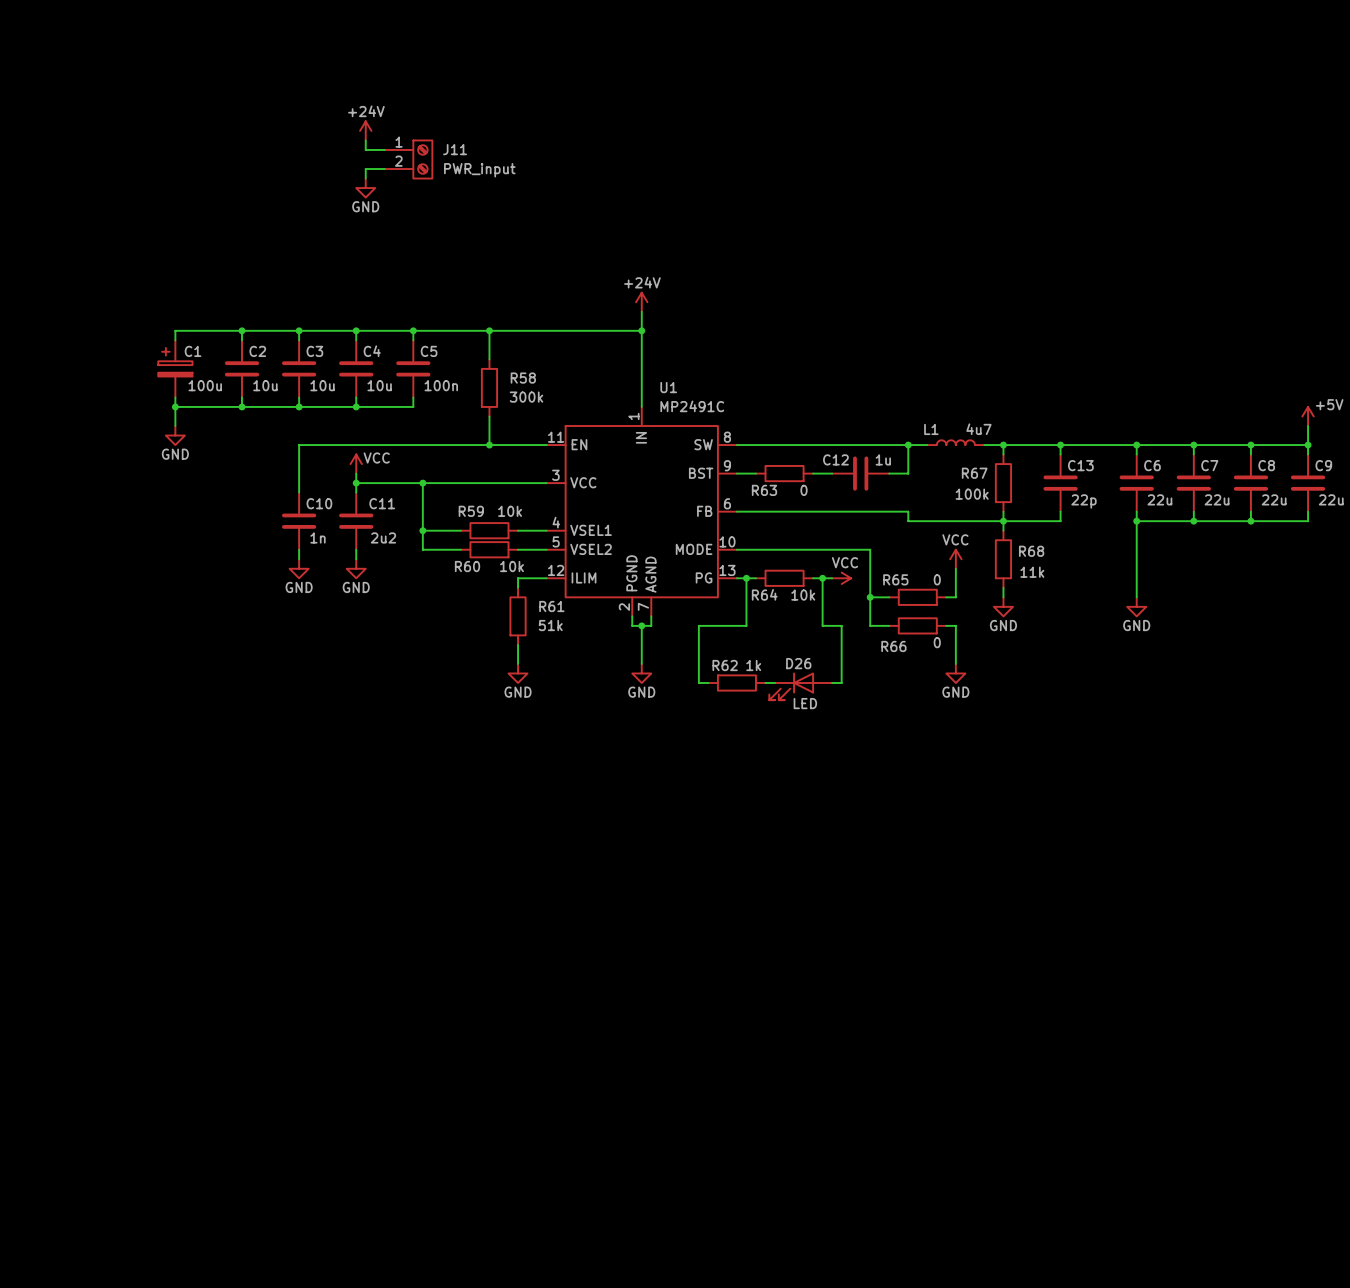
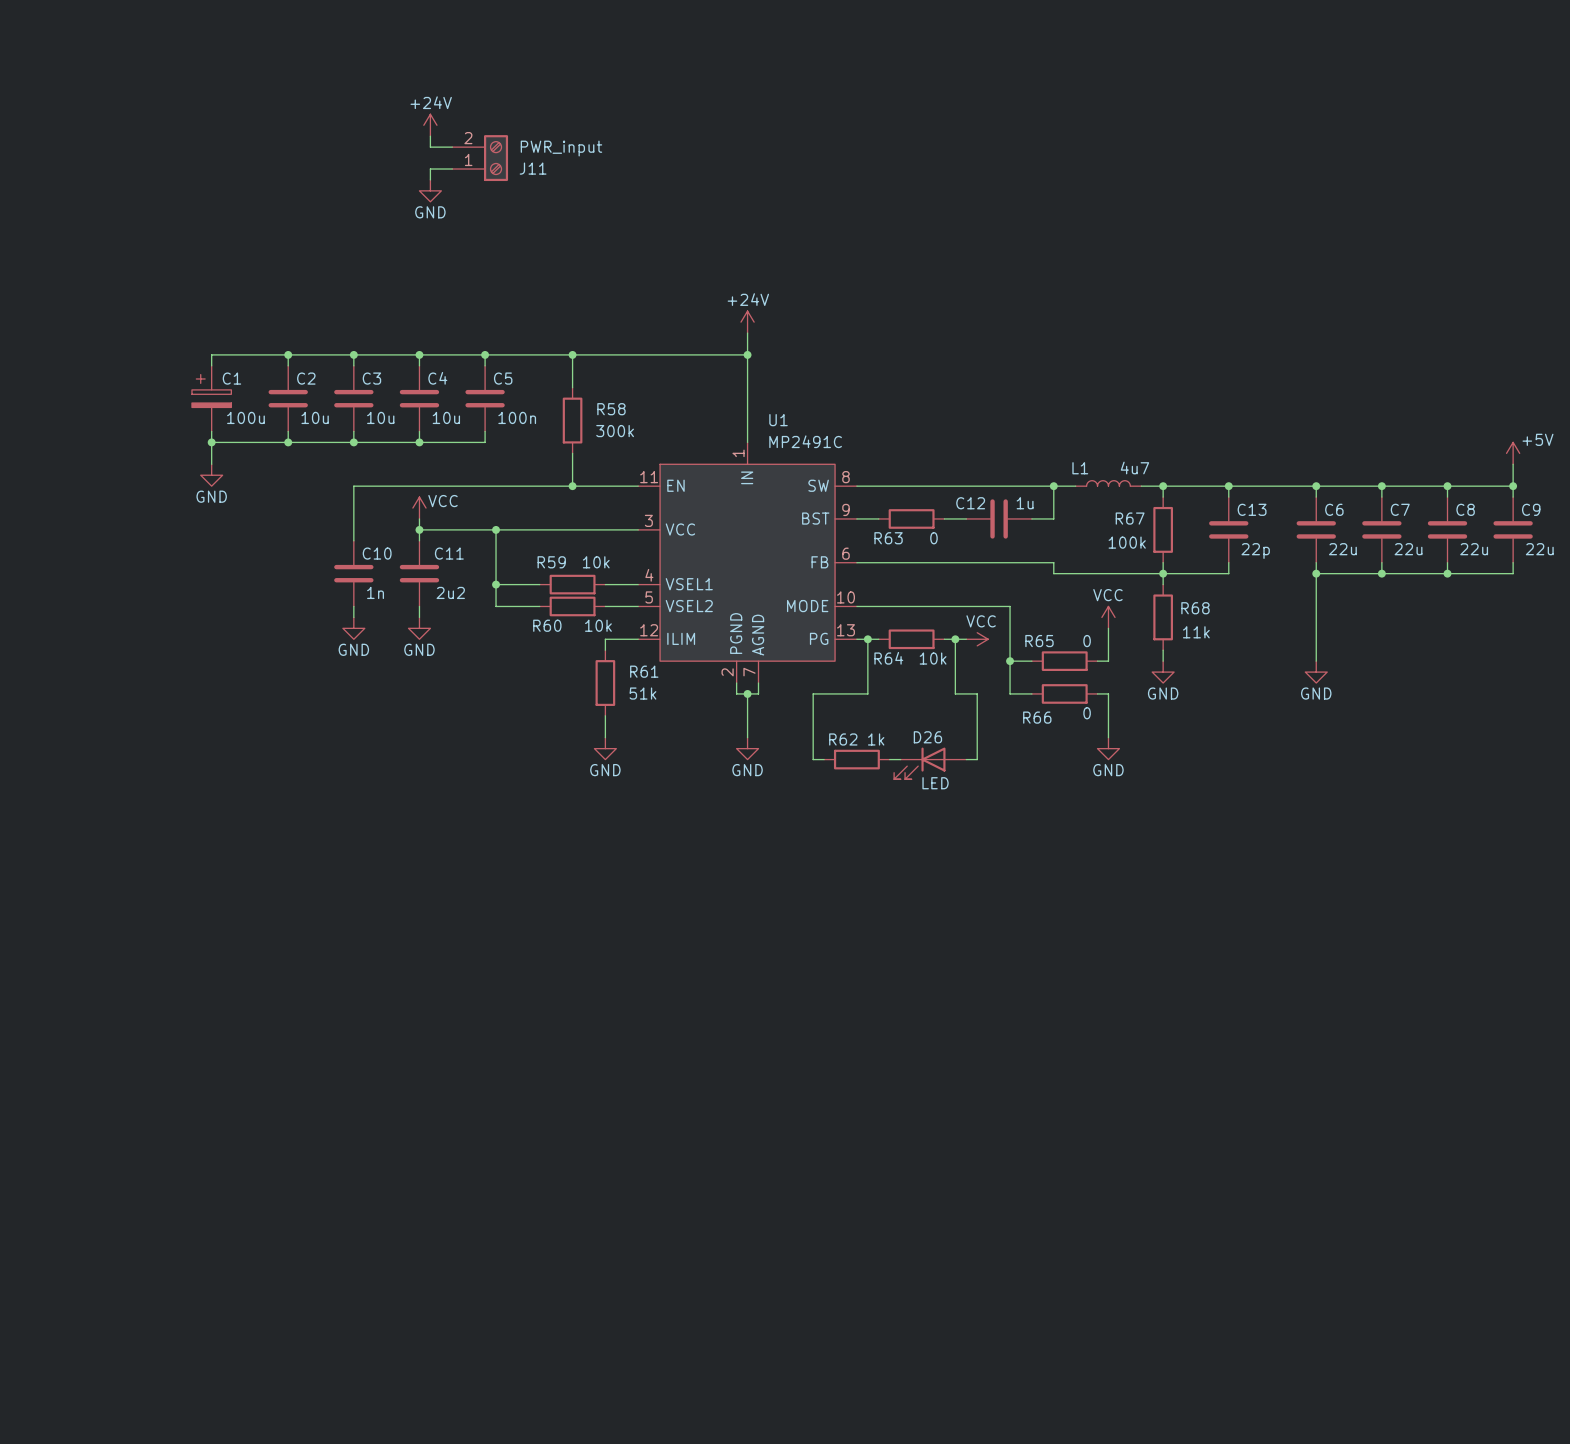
J11 flip: as is (422, 159) -> up-down (496, 158)

